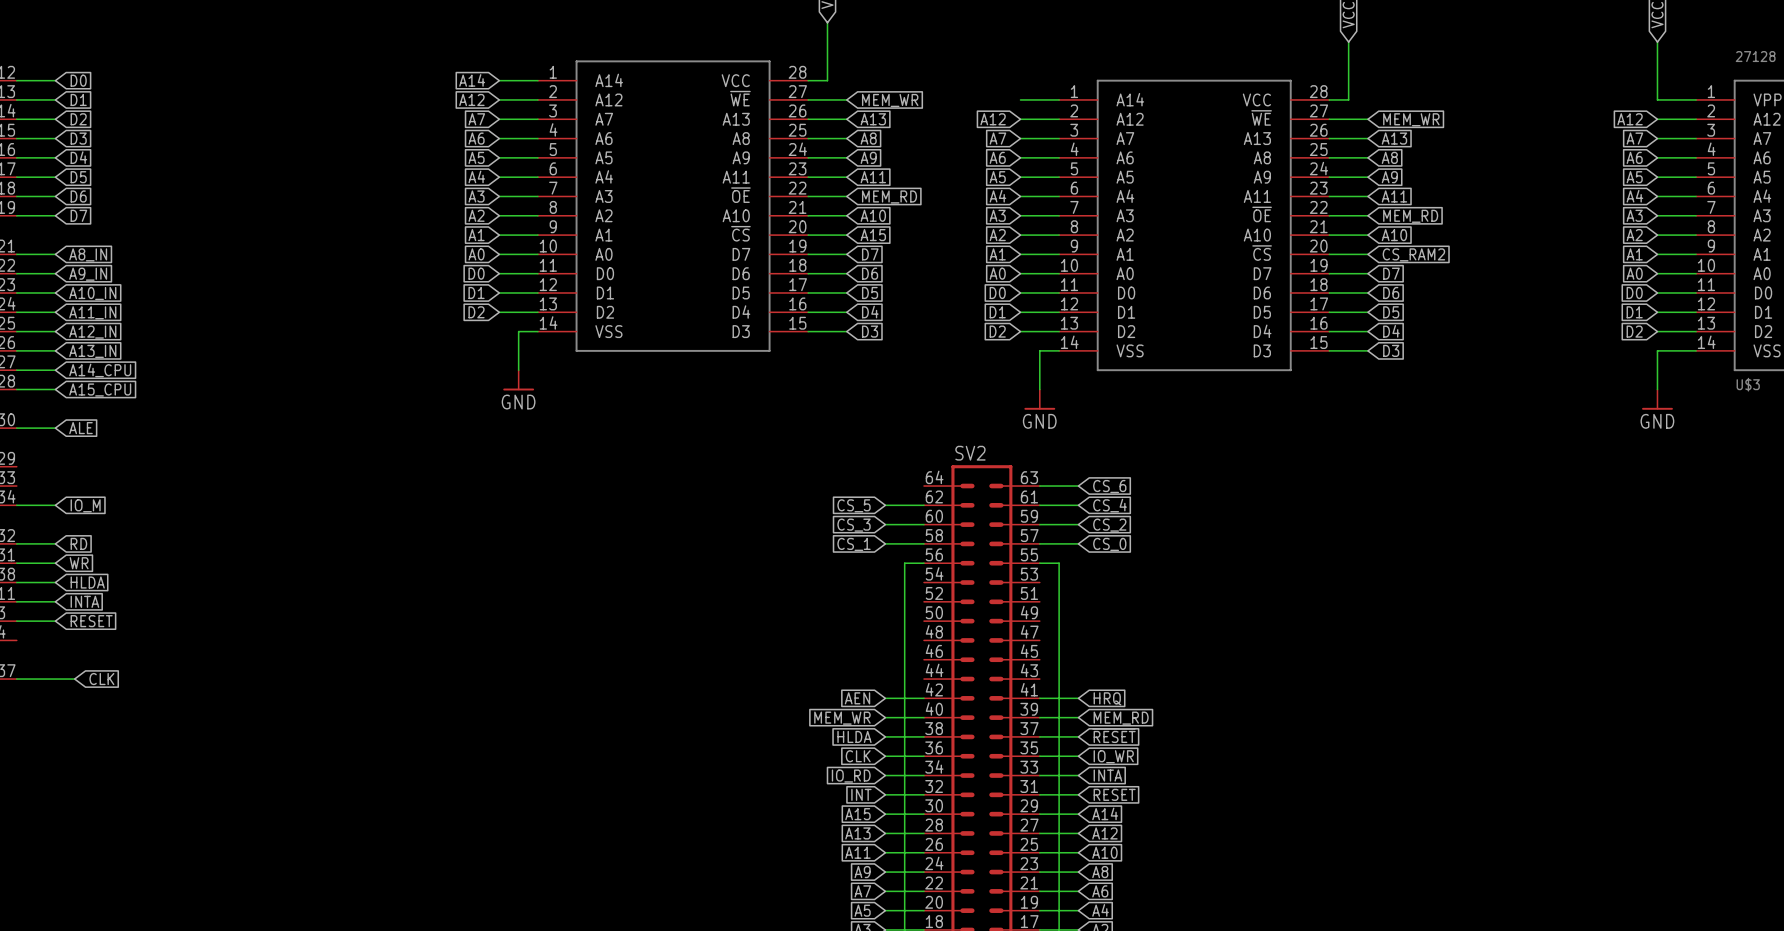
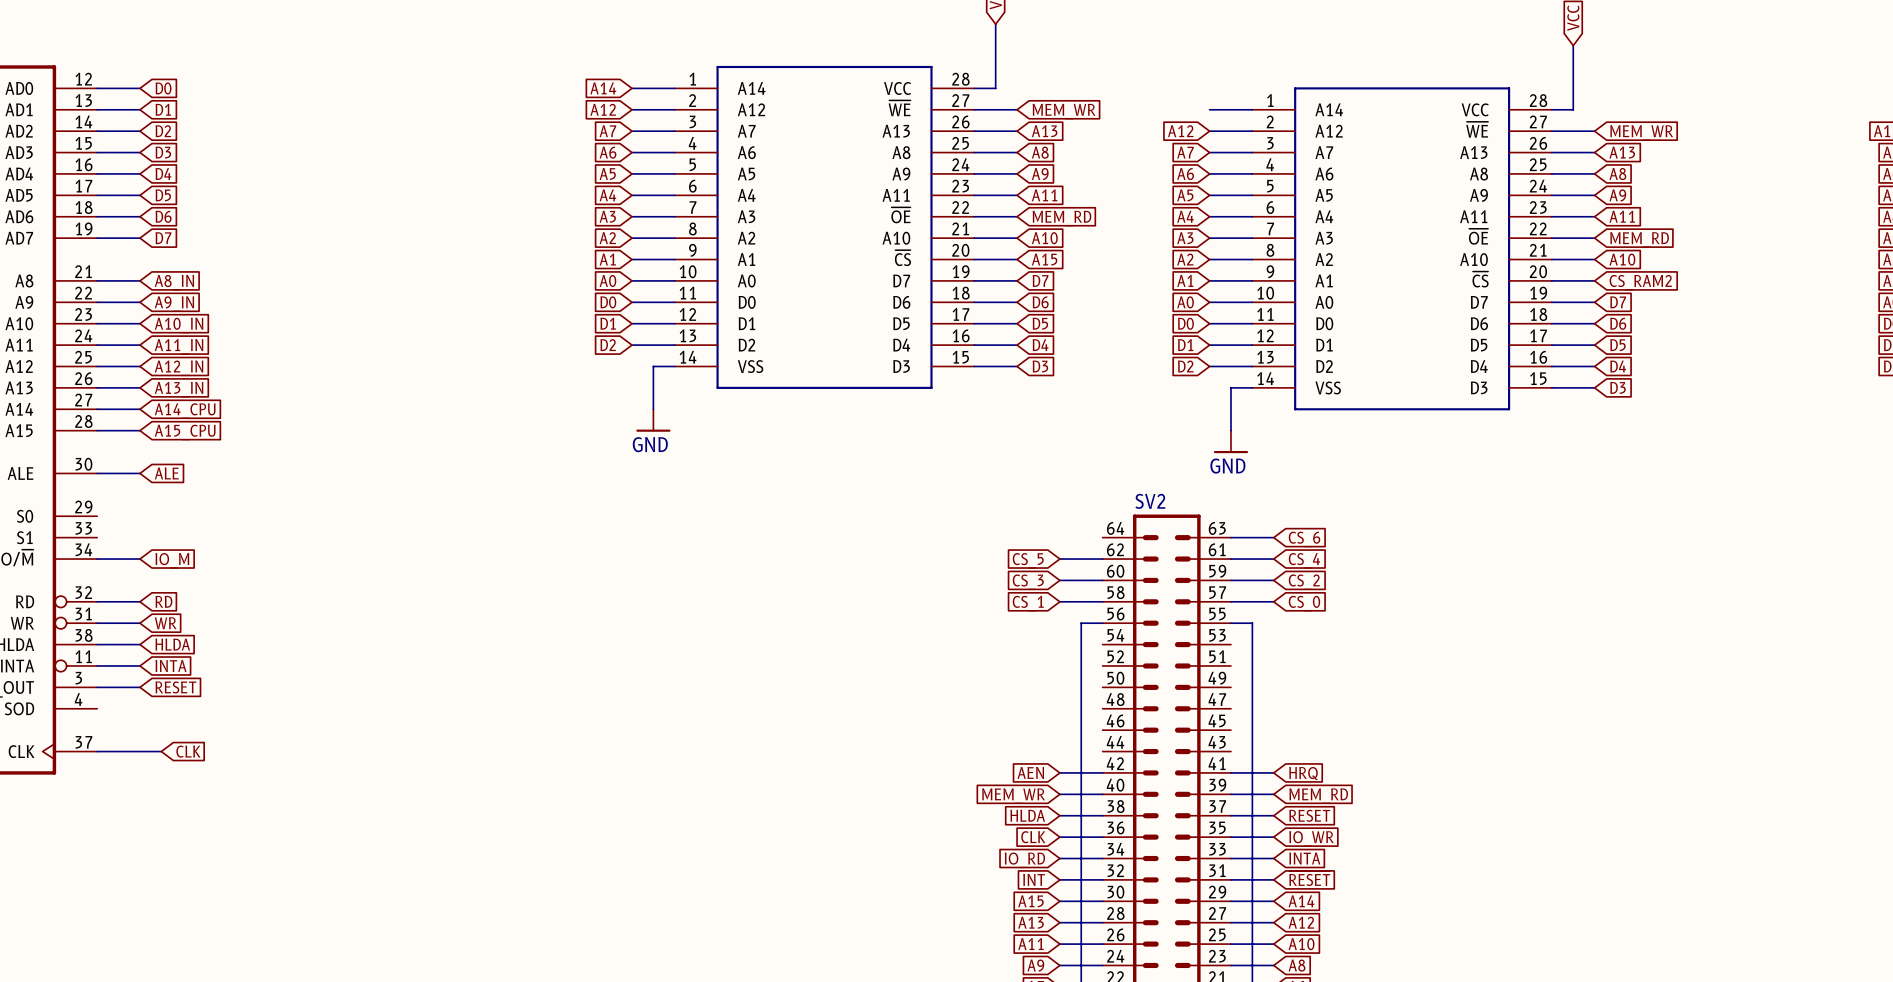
global label: ~{RESET} (1113, 735) -> RESET (1309, 815)
global label: RESET (1114, 794) -> ~{RESET} (1309, 878)

